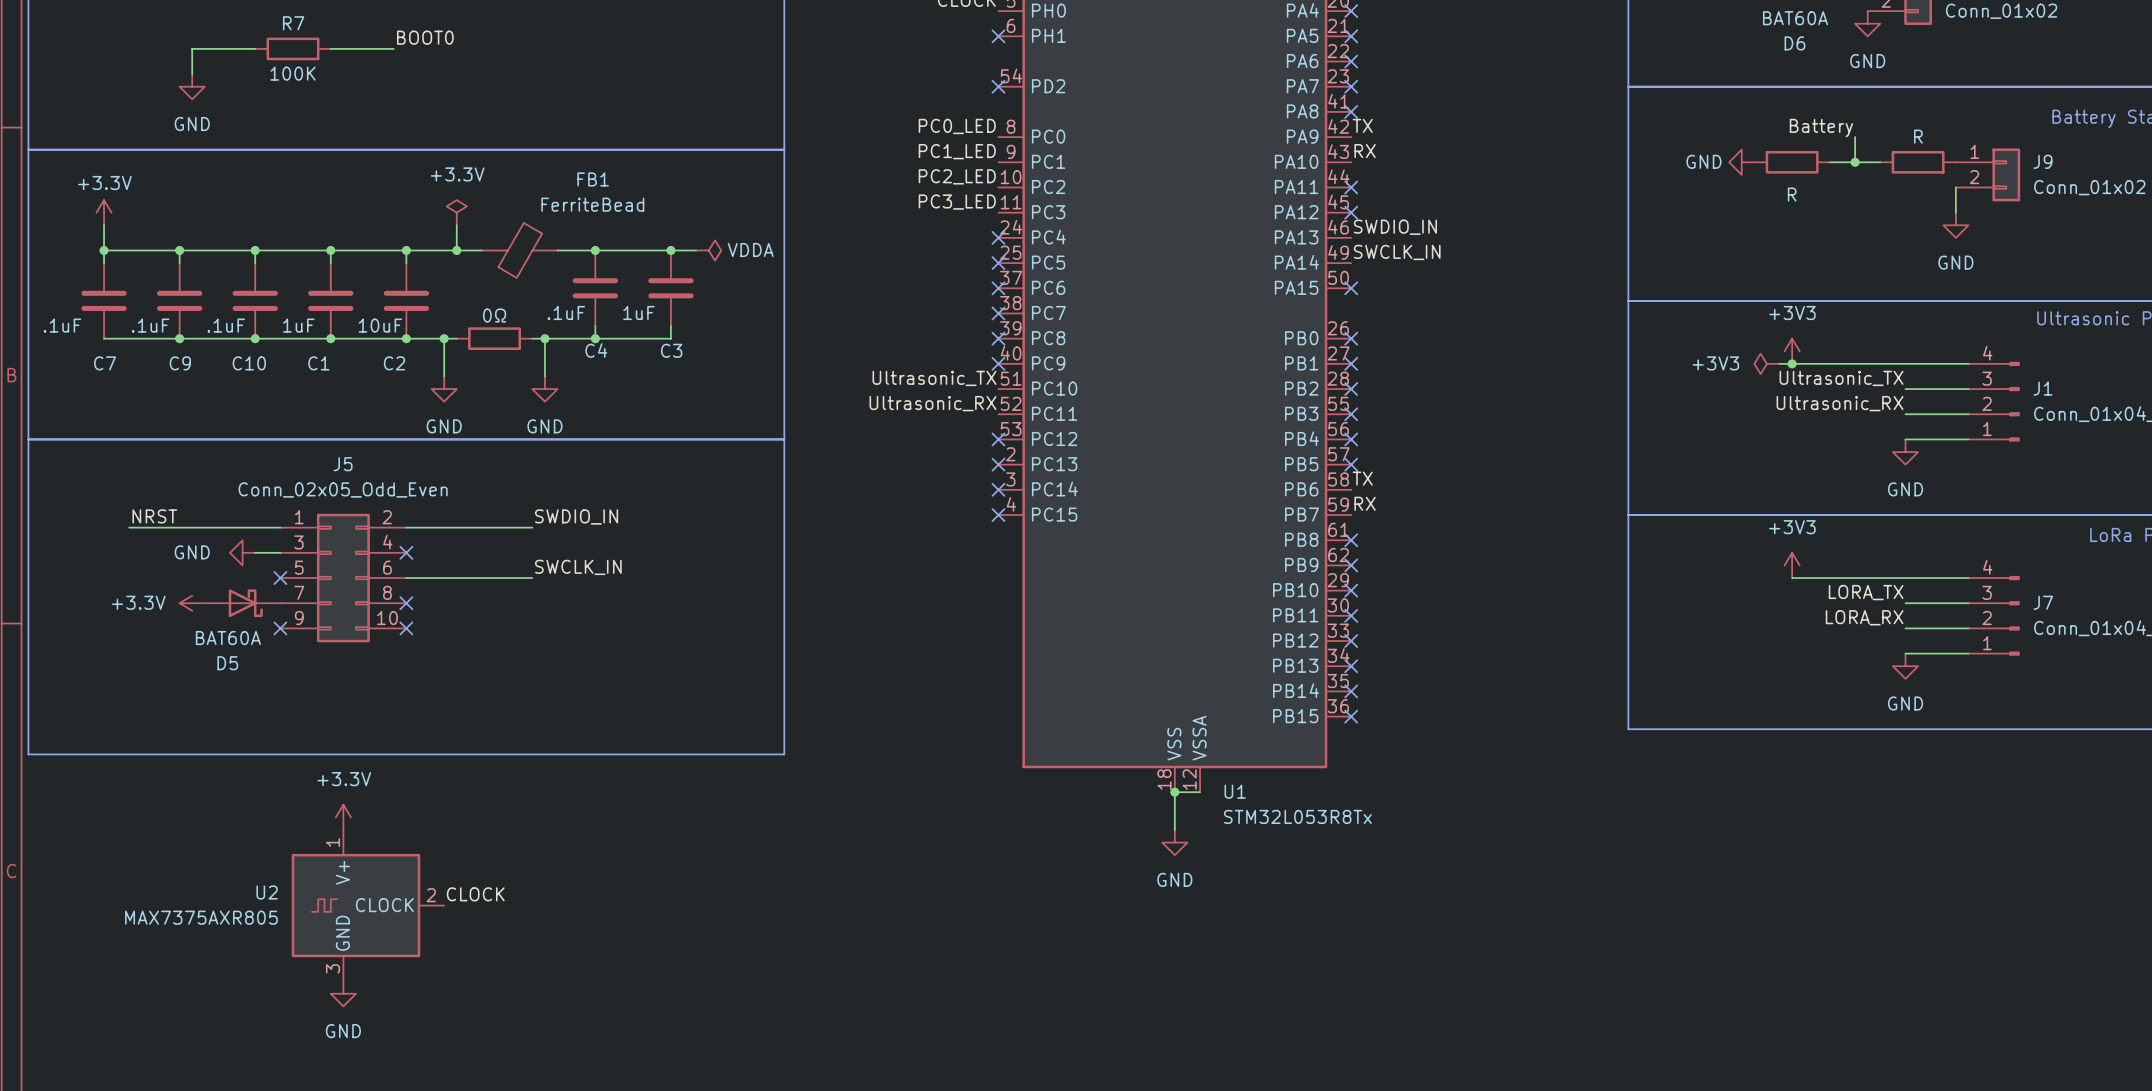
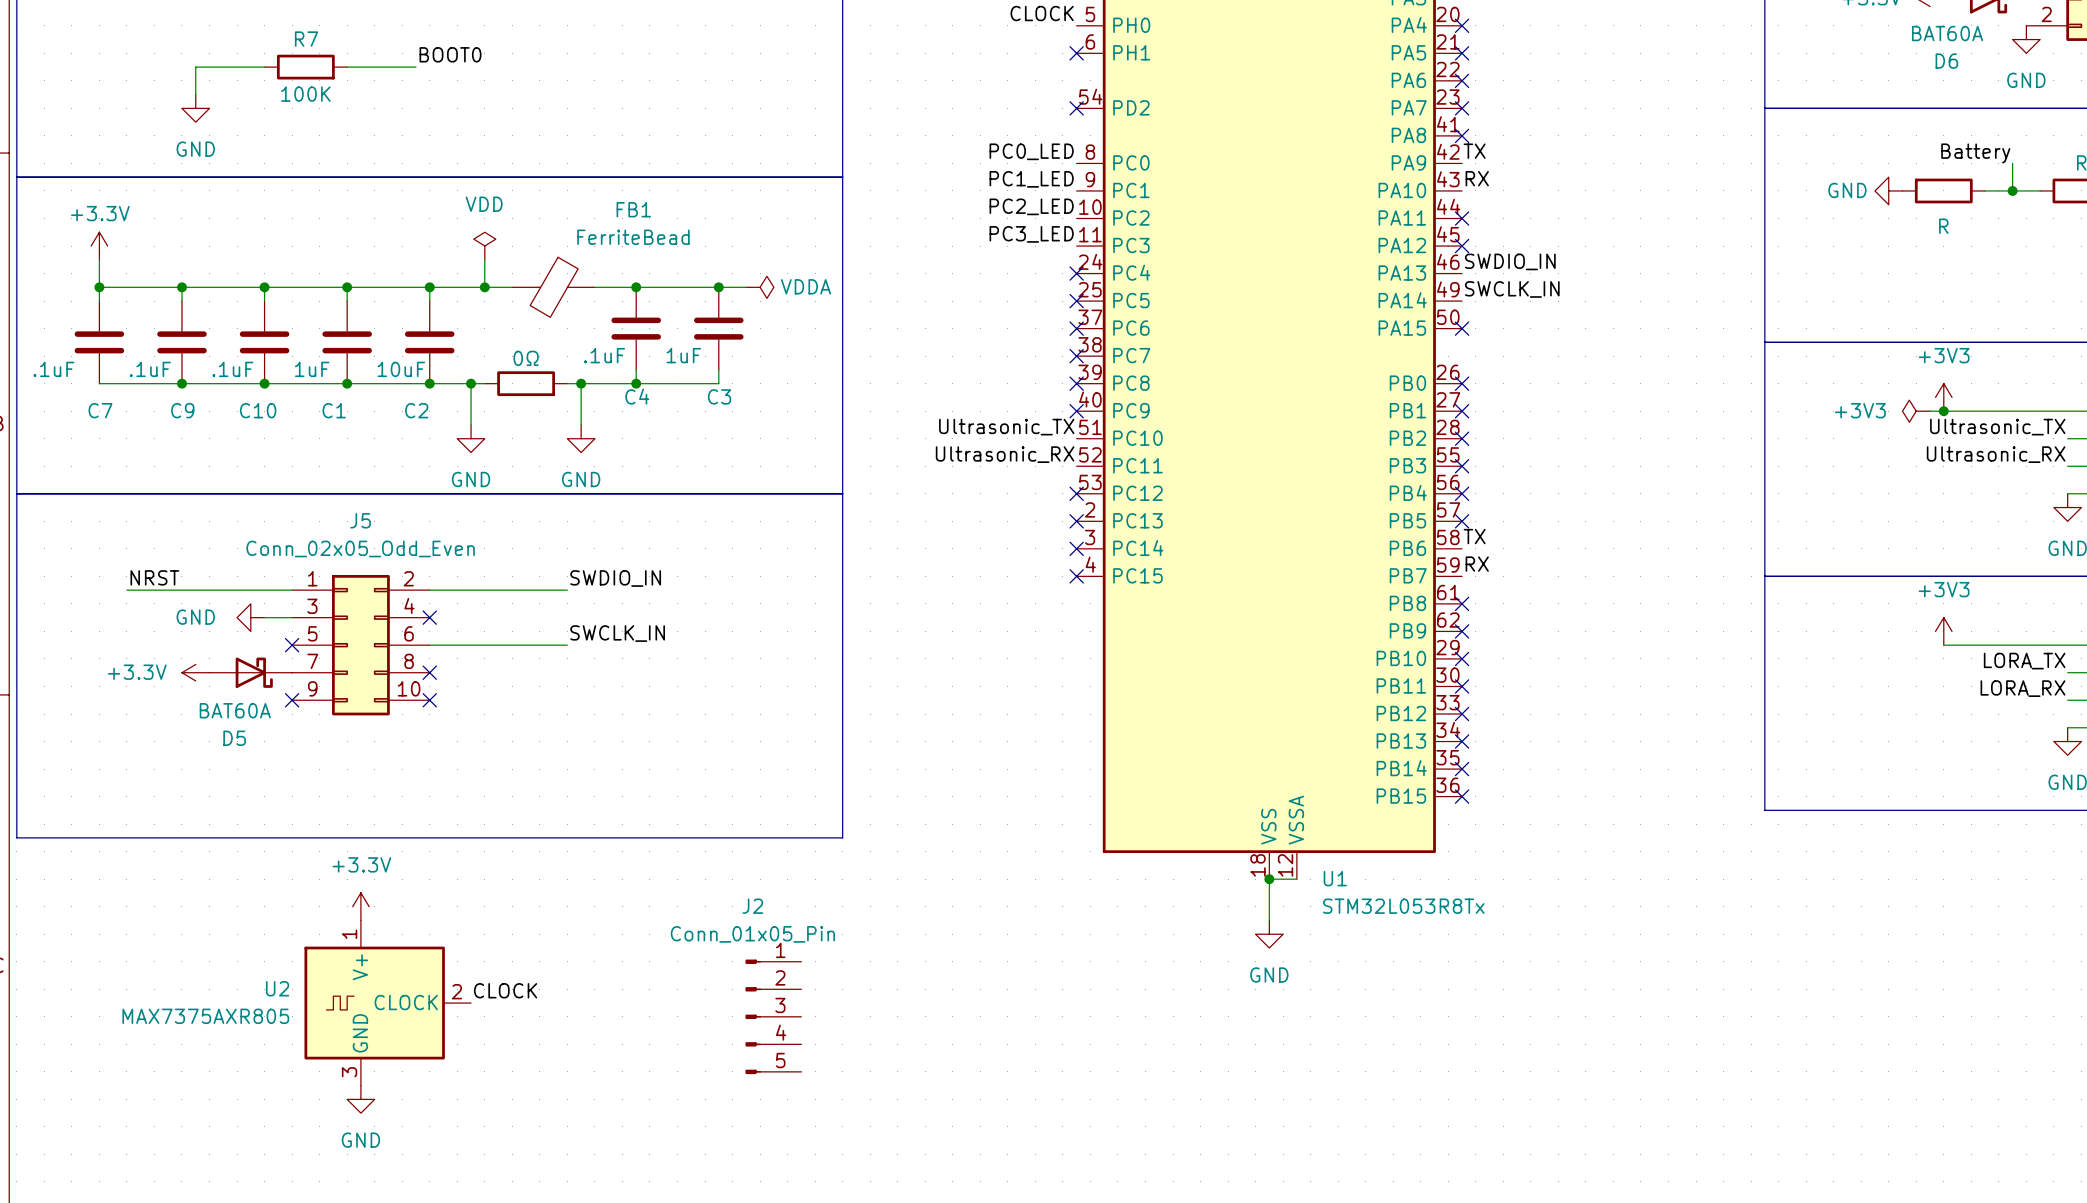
power symbol: +3.3V (456, 212) -> VDD (484, 246)
J2: none -> Conn_01x05_Pin (773, 1016)

